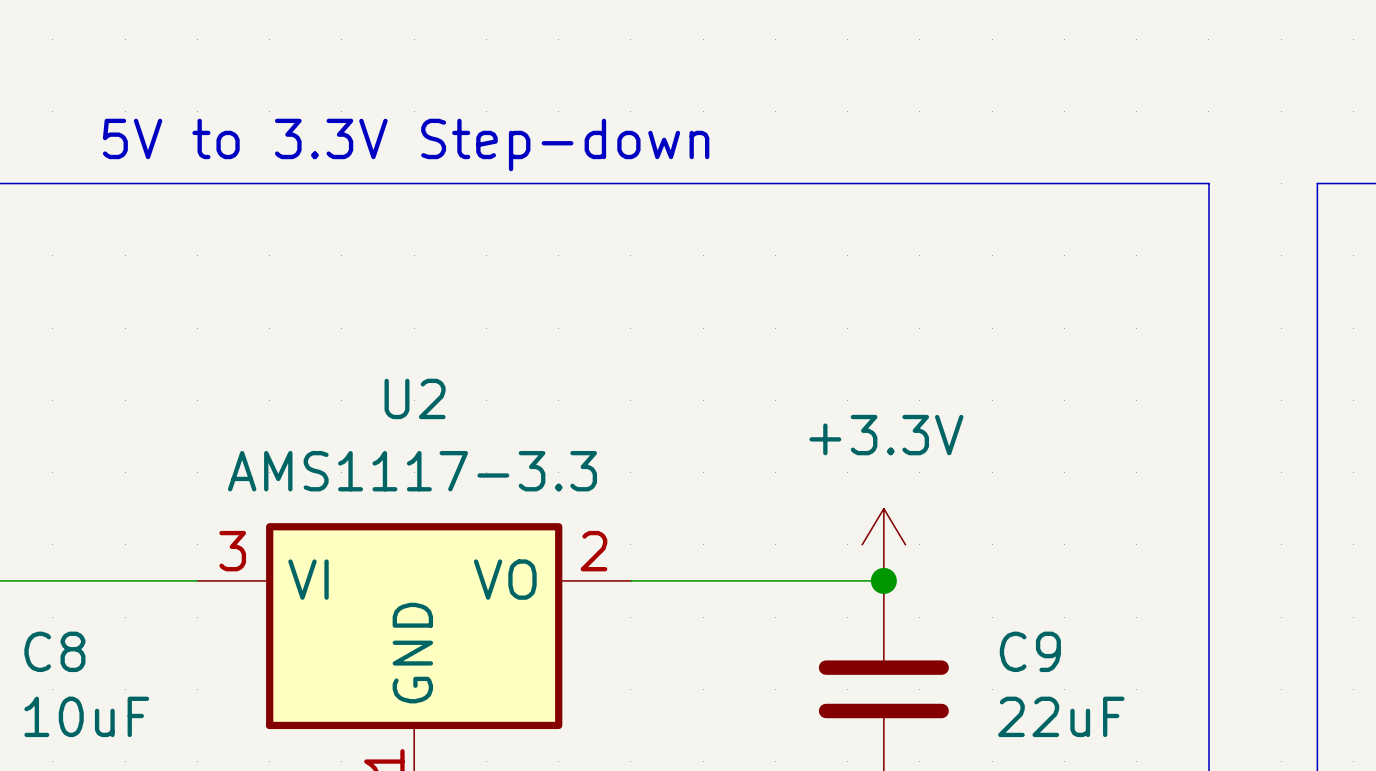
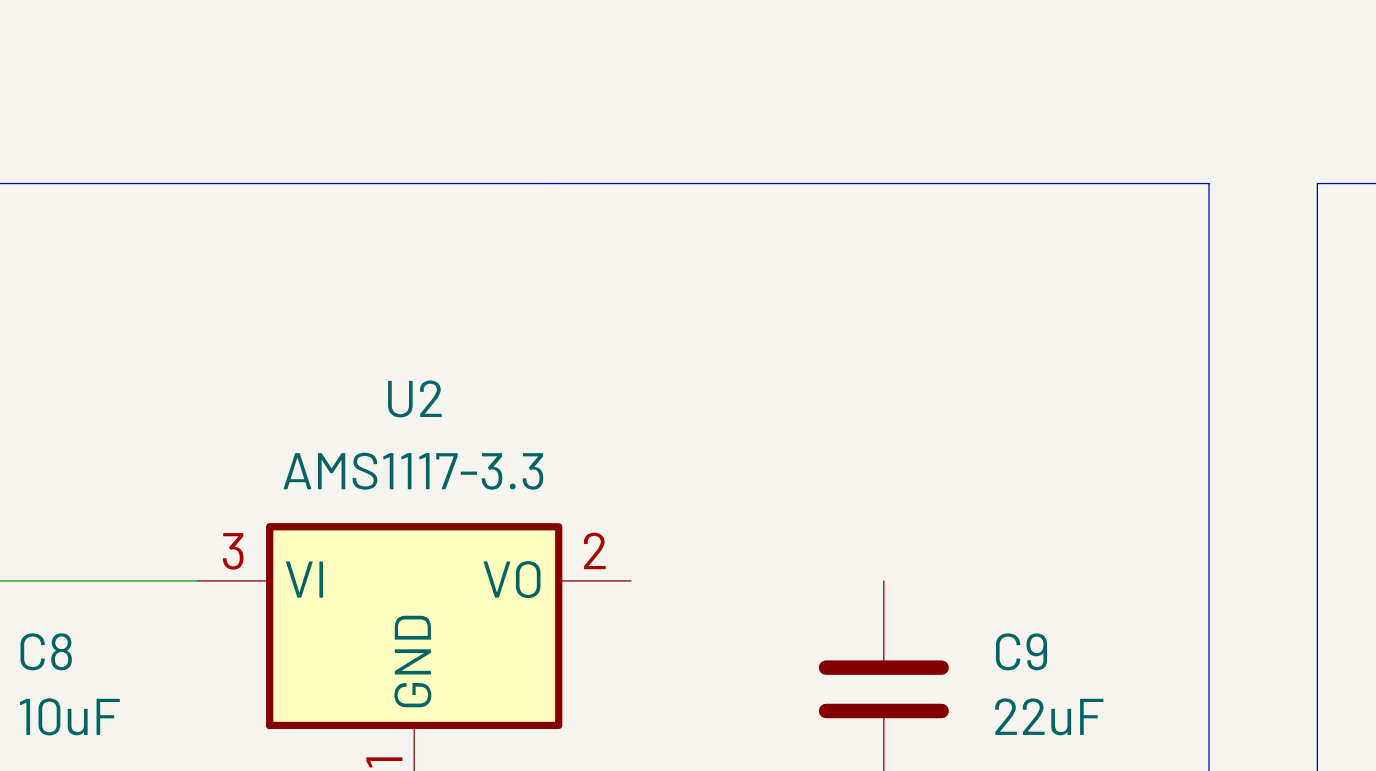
text: 5V to 3.3V Step-down (406, 144) -> none
power symbol: +3.3V (883, 544) -> none
wire: (630, 580) (883, 580) -> none
junction: (883, 580) -> none

